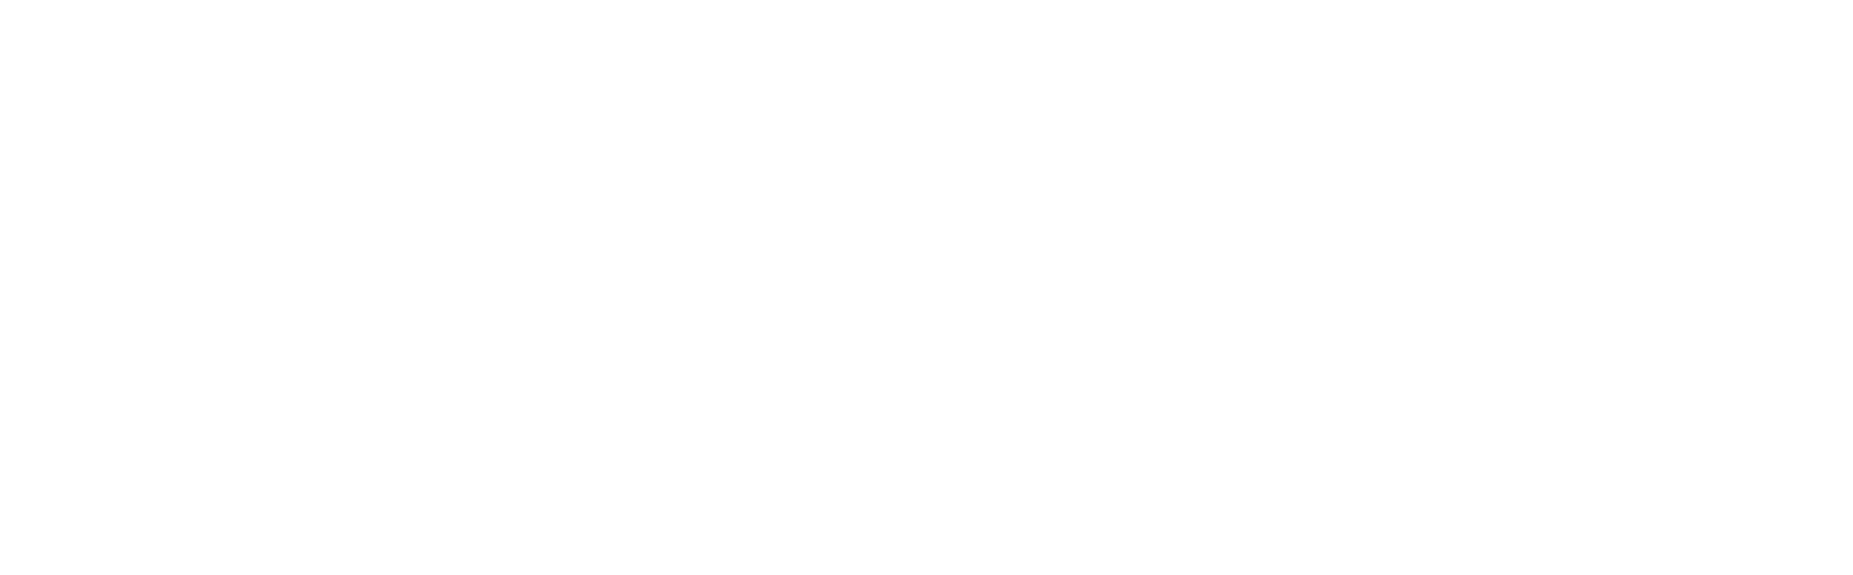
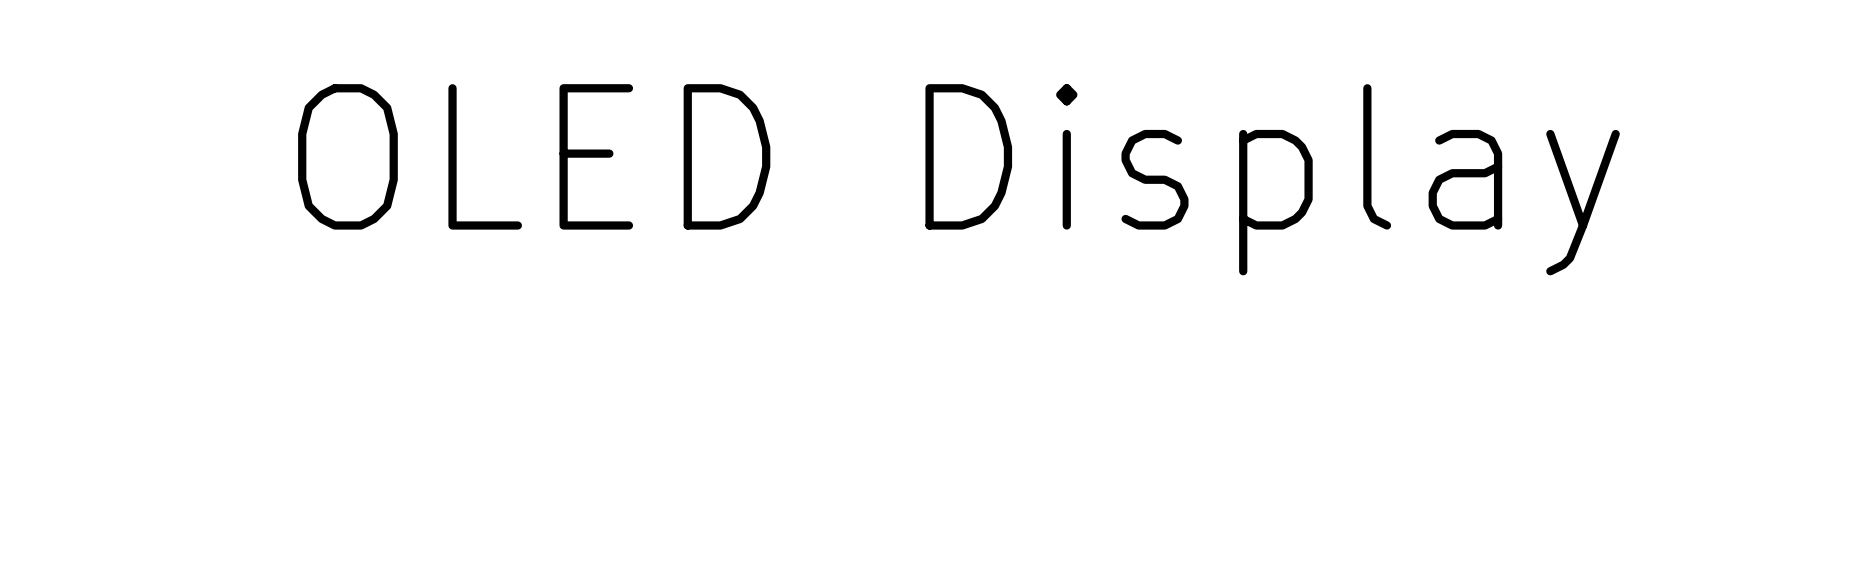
text: none -> OLED Display (958, 179)

